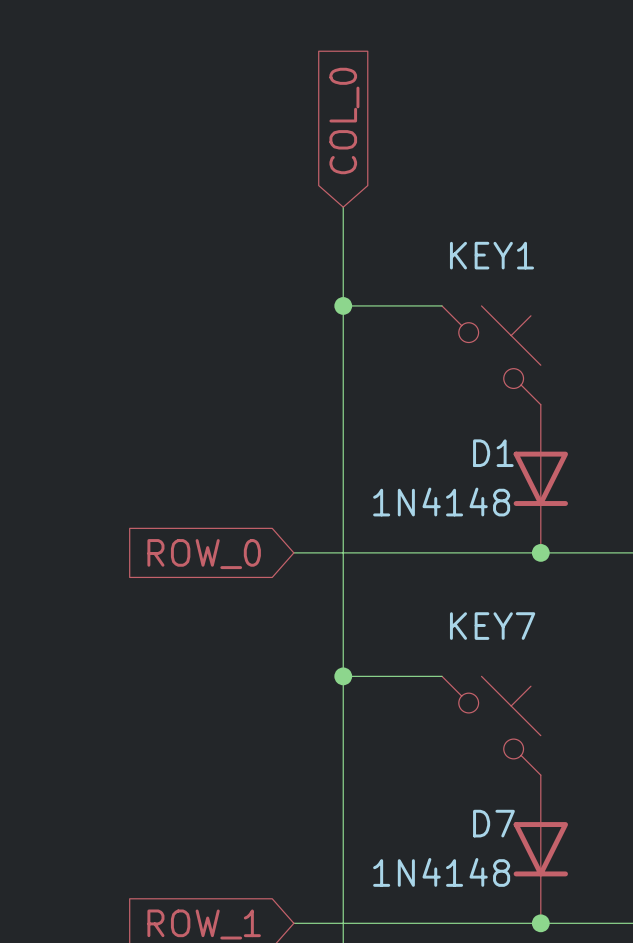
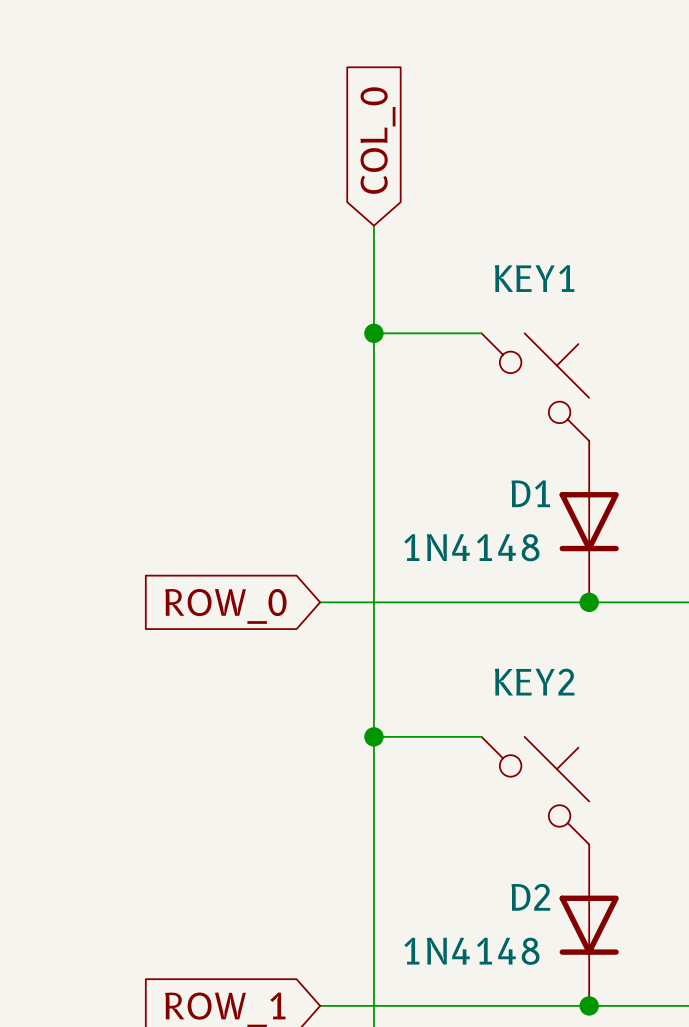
KEY7 name: KEY7 (492, 626) -> KEY2 (534, 682)
D7 name: D7 (493, 823) -> D2 (530, 897)

